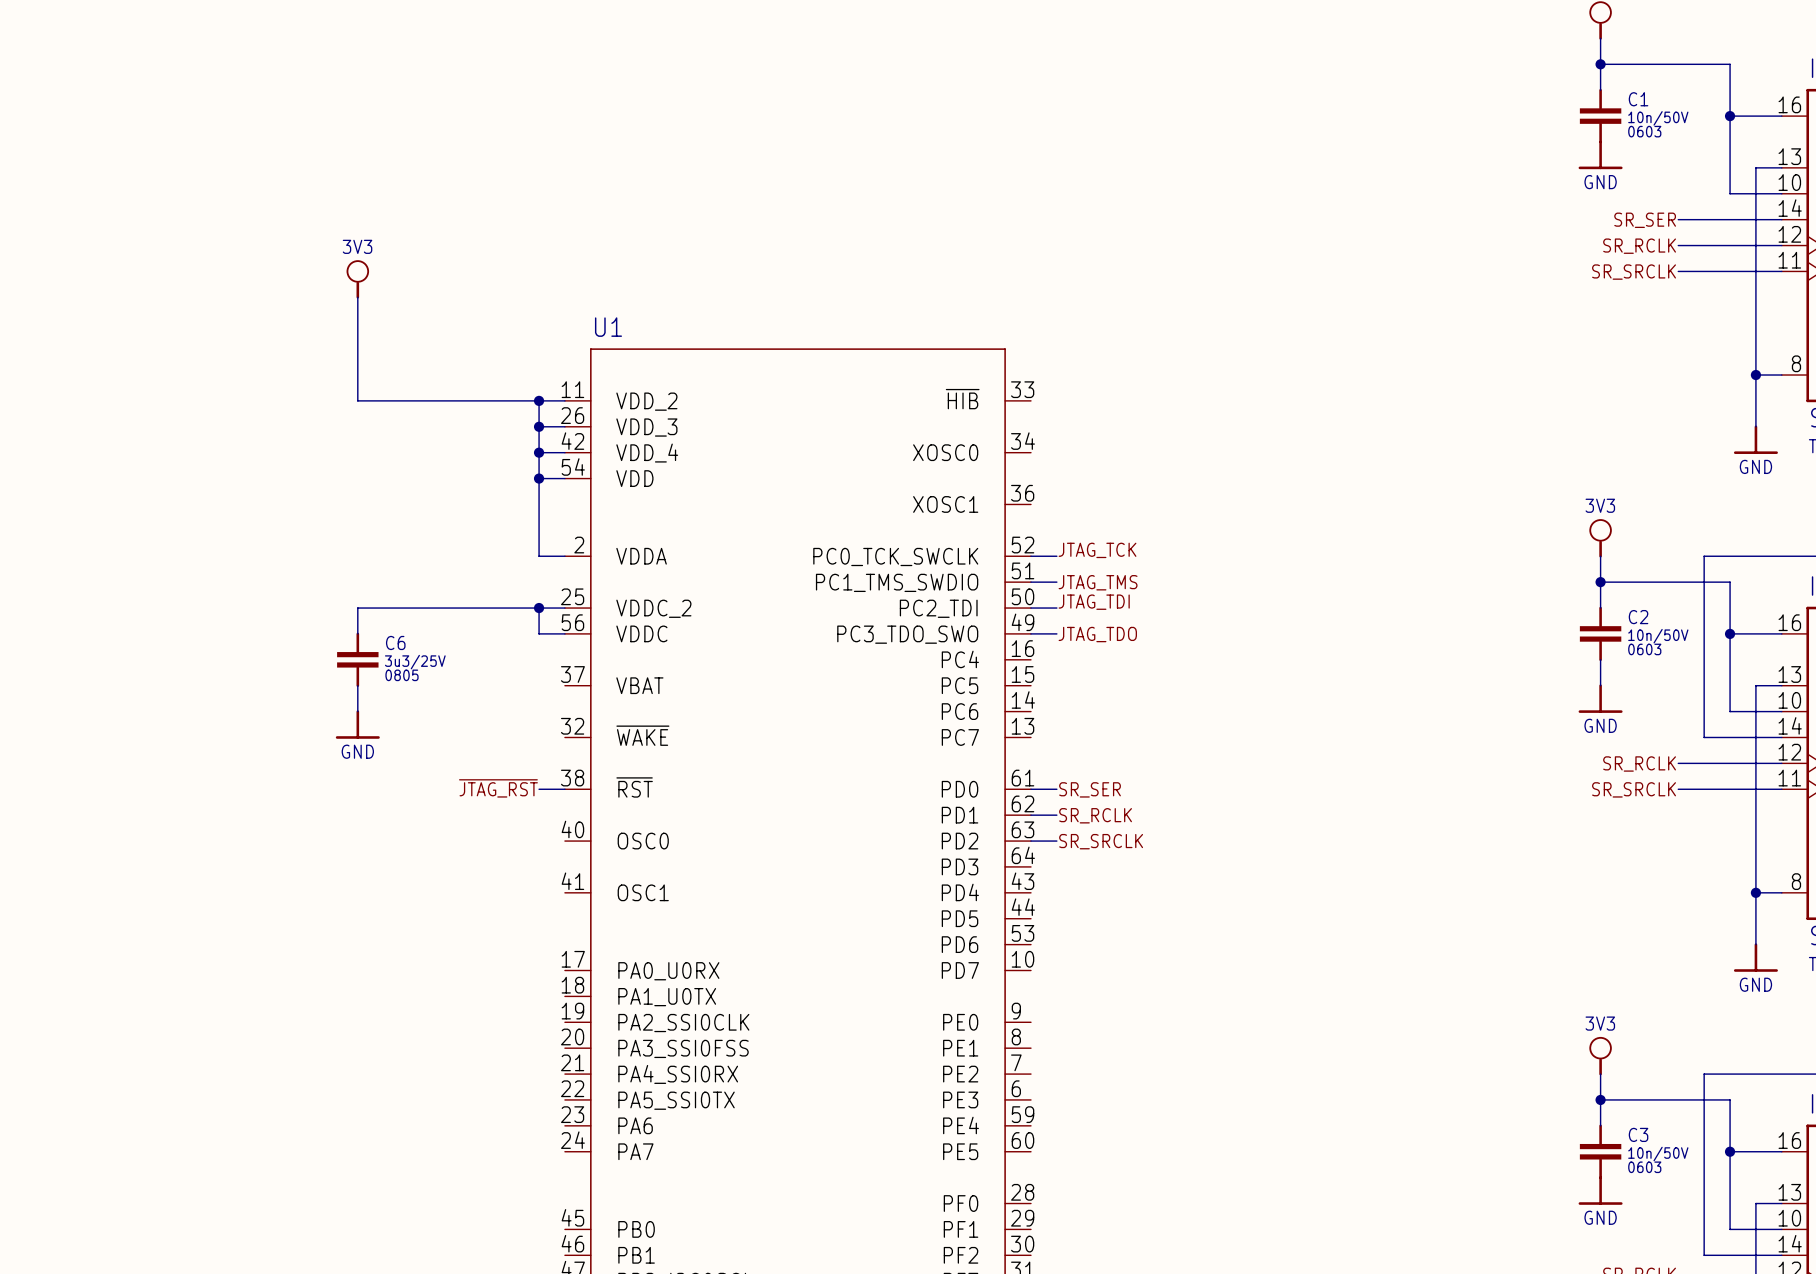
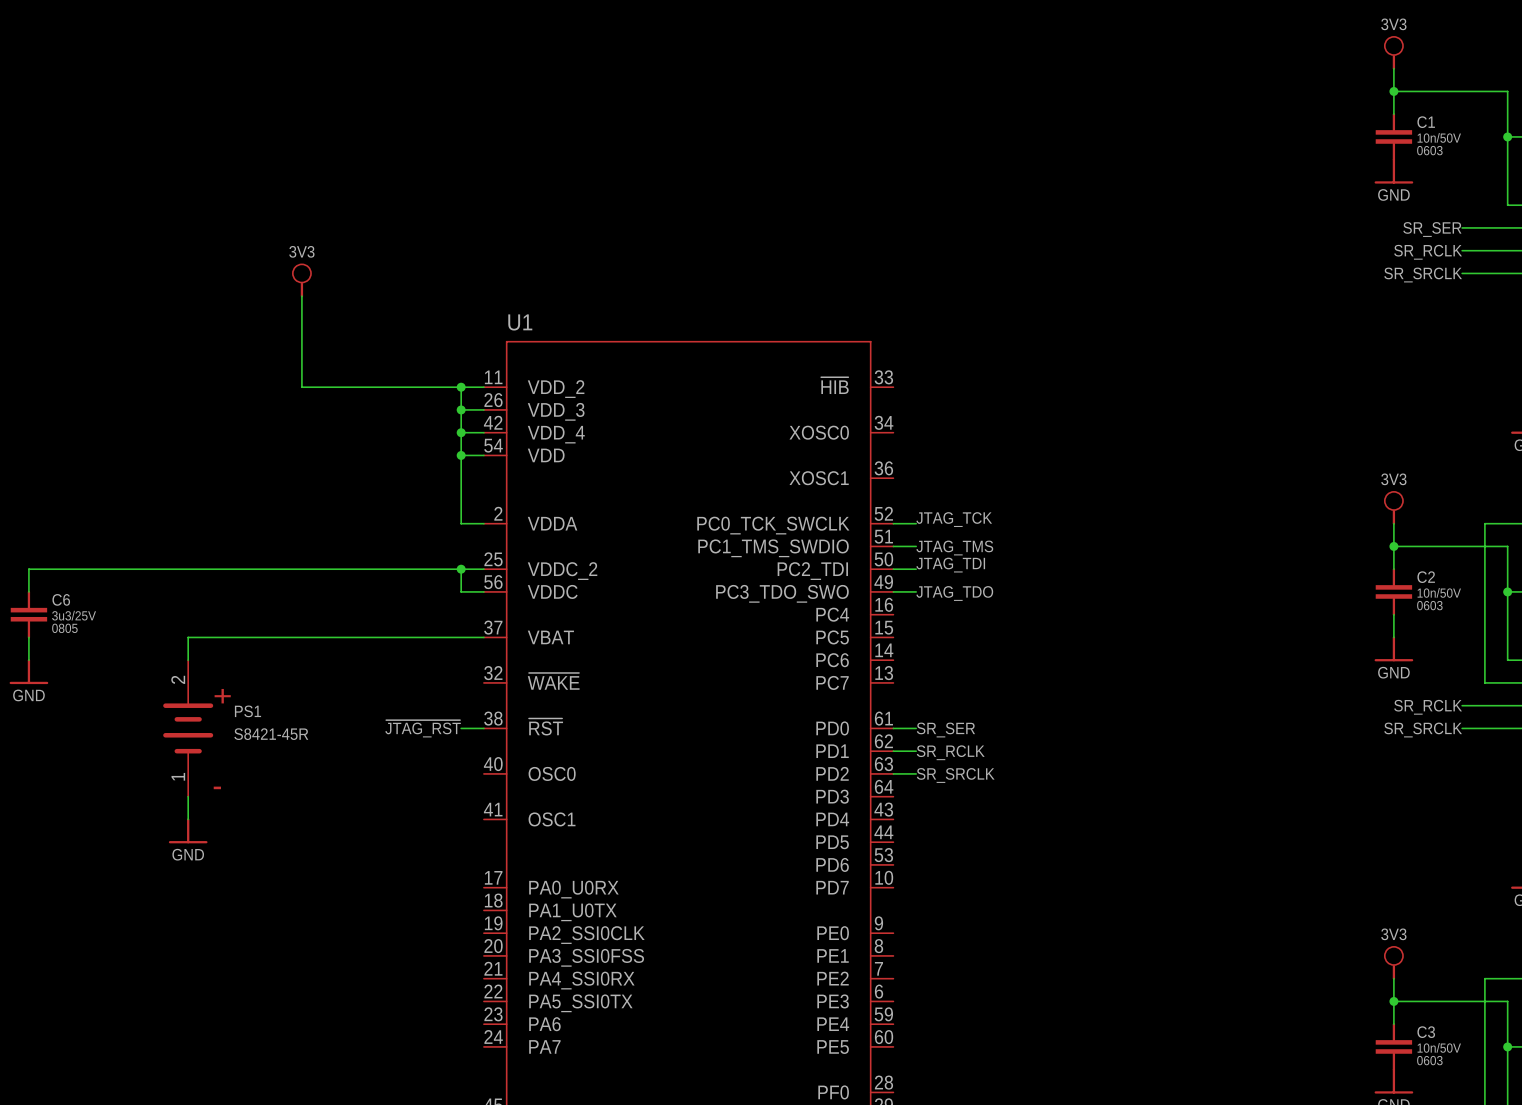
wire: (357, 608) (357, 633) -> (301, 569) (28, 569) (28, 591)
C6 position: (357, 659) -> (28, 614)
wire: none -> (28, 637) (28, 660)
wire: (357, 685) (357, 711) -> (188, 796) (188, 819)
wire: none -> (483, 637) (188, 637) (188, 660)
power symbol: none -> GND (28, 671)
power symbol: GND (357, 724) -> none
PS1: none -> S8421-45R (188, 728)
power symbol: none -> GND (188, 830)

